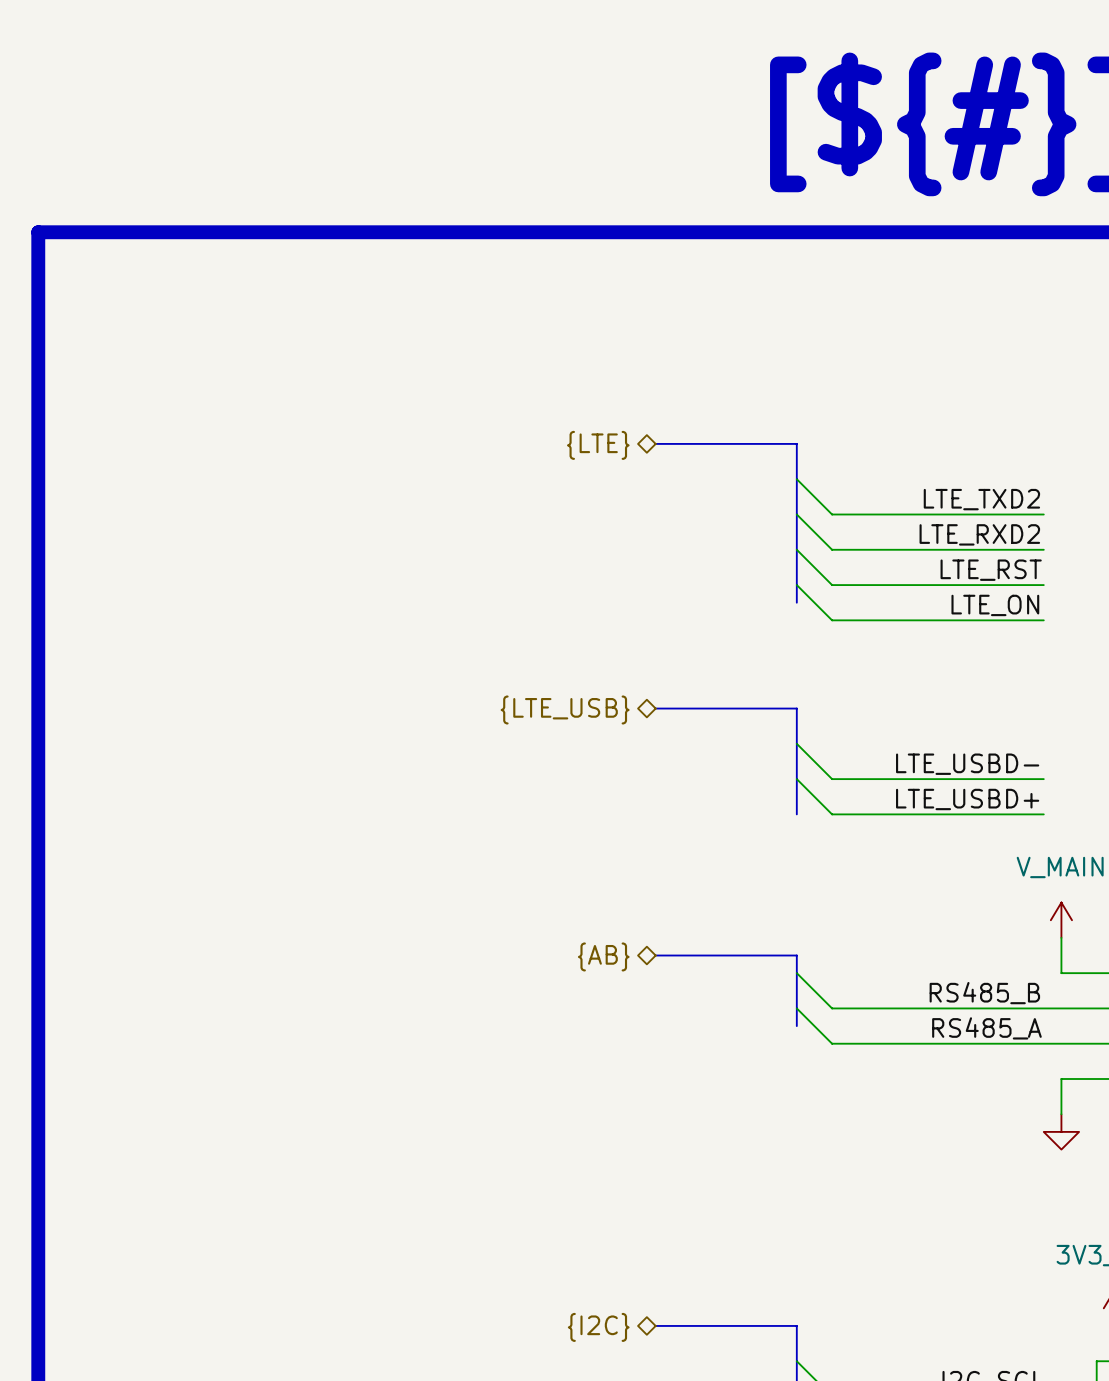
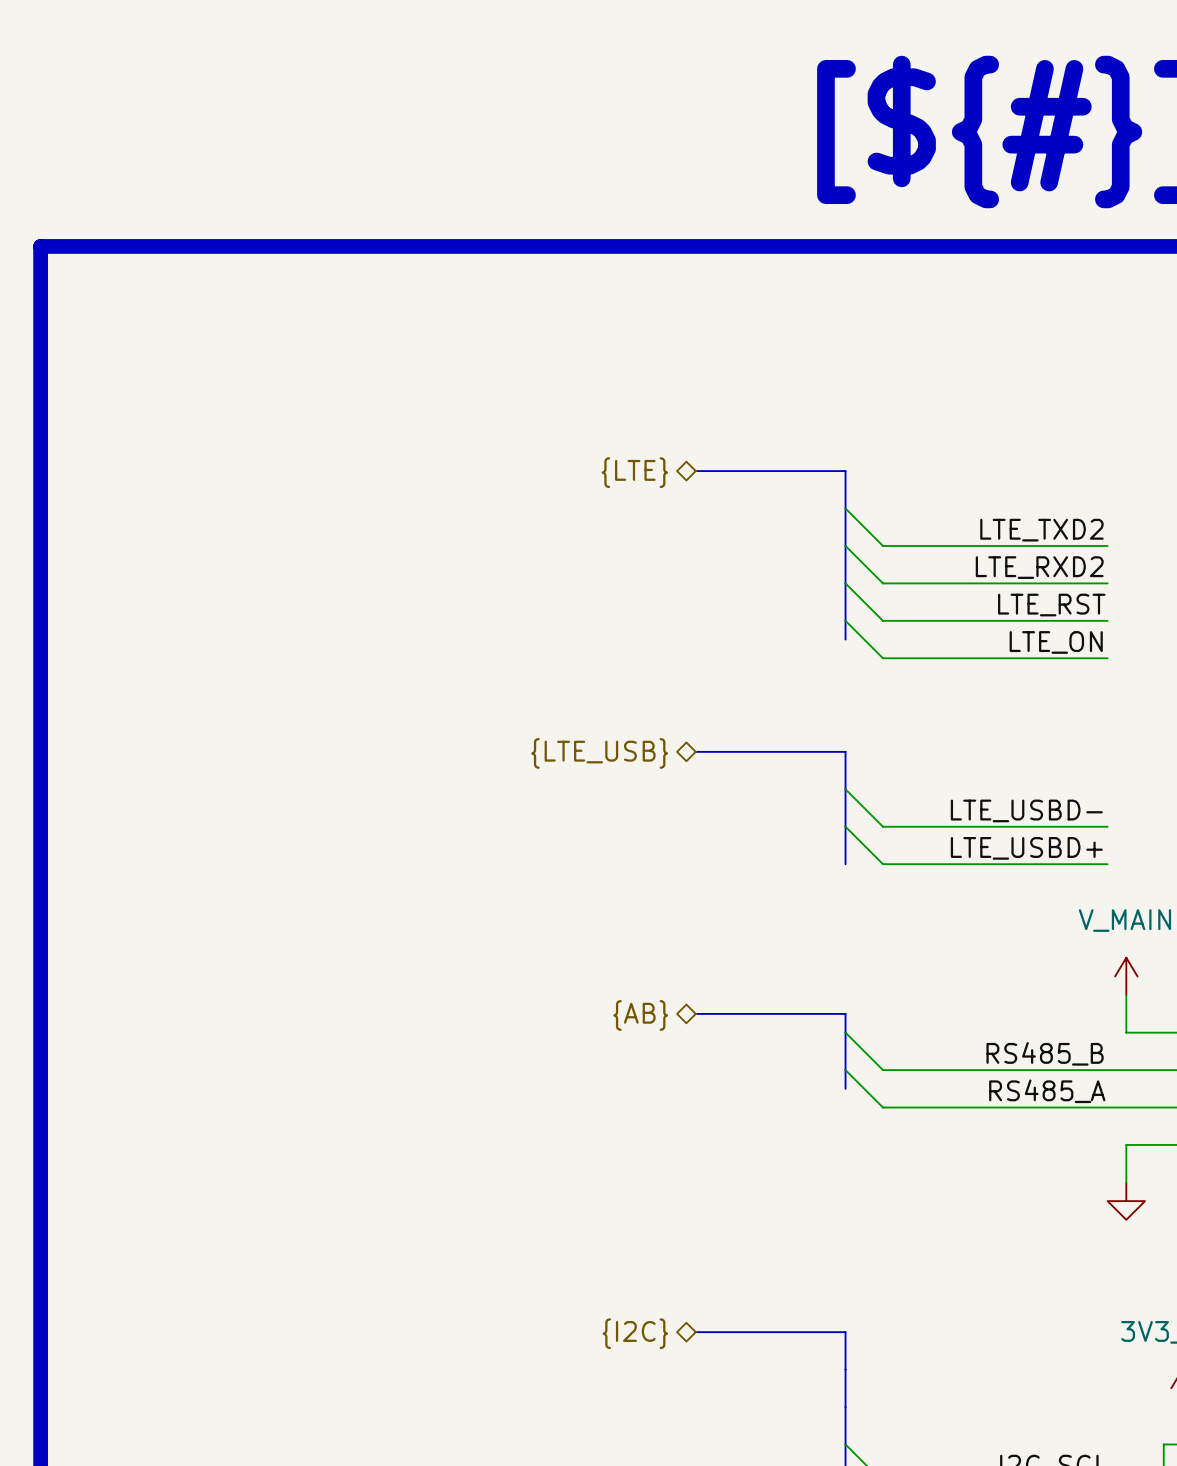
bus: (655, 1325) (796, 1325) -> (695, 1332) (845, 1332) (845, 1407)
hierarchical label position: {I2C} (598, 1327) -> {I2C} (635, 1333)

